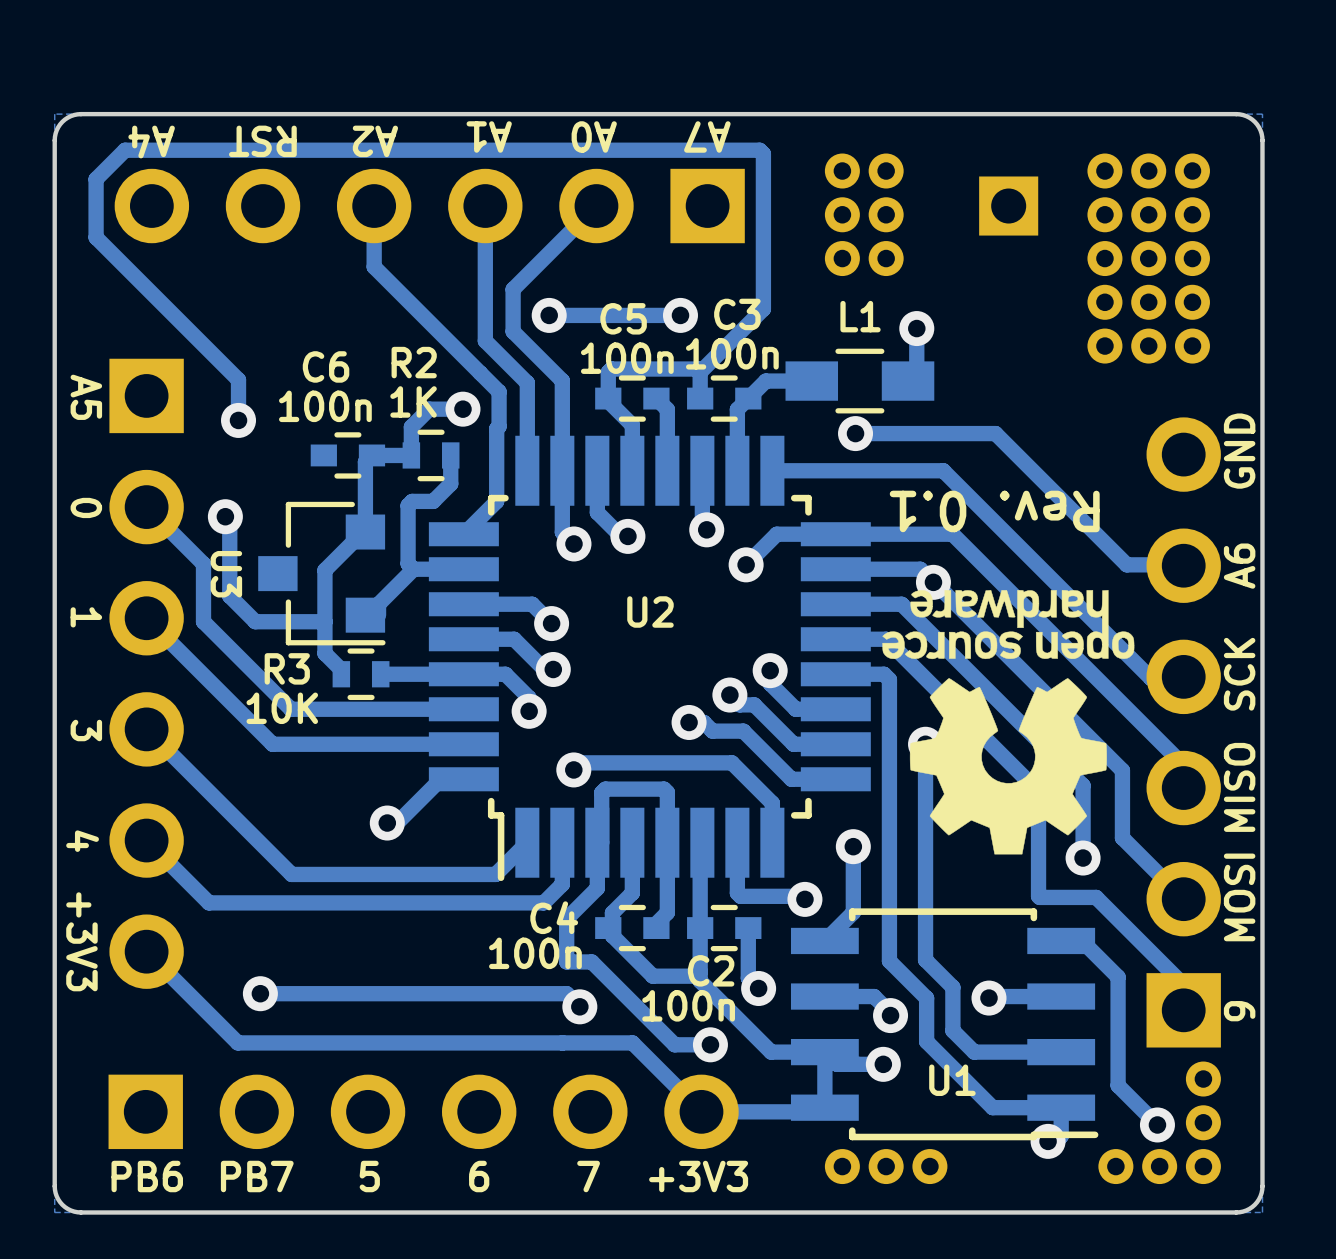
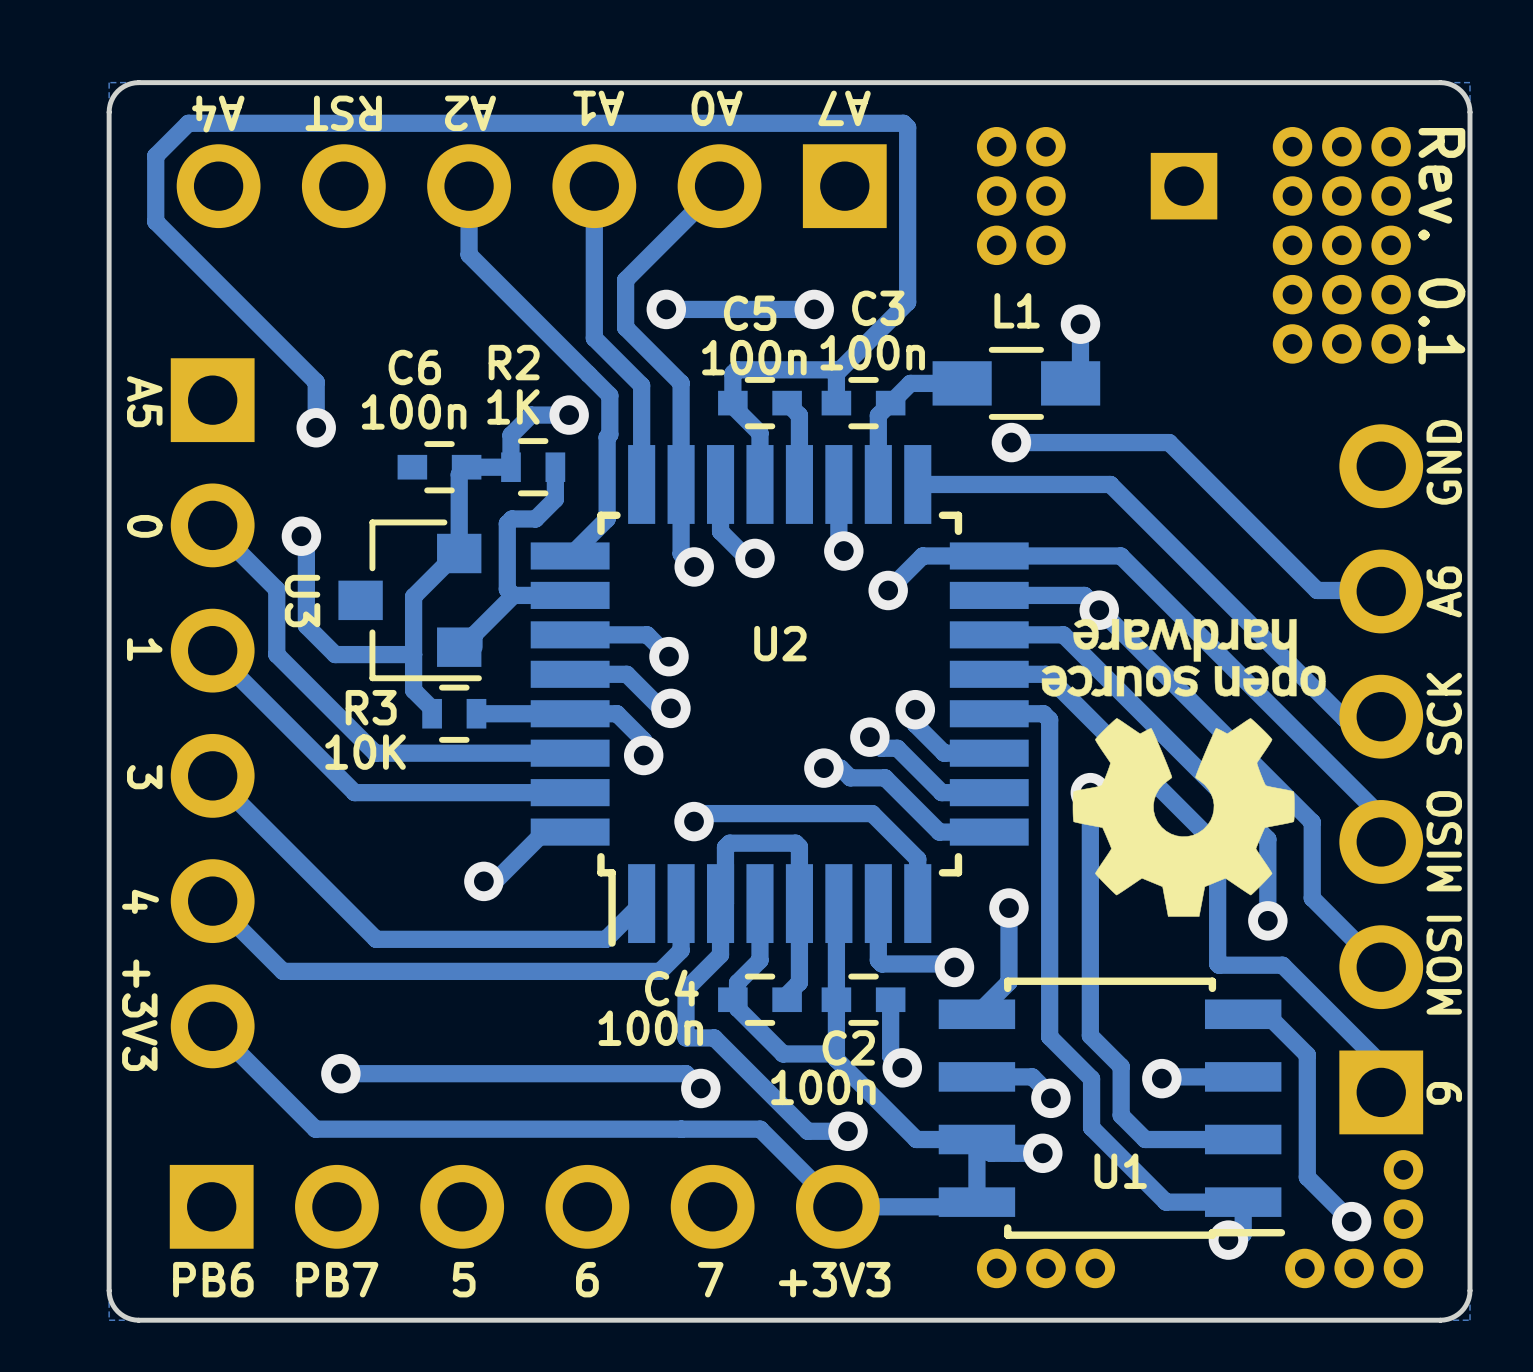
text rotation: 0° (994, 511) -> 90° counterclockwise (1441, 246)
text position: Rev. 0.1 (994, 511) -> Rev. 0.1 (1441, 246)

